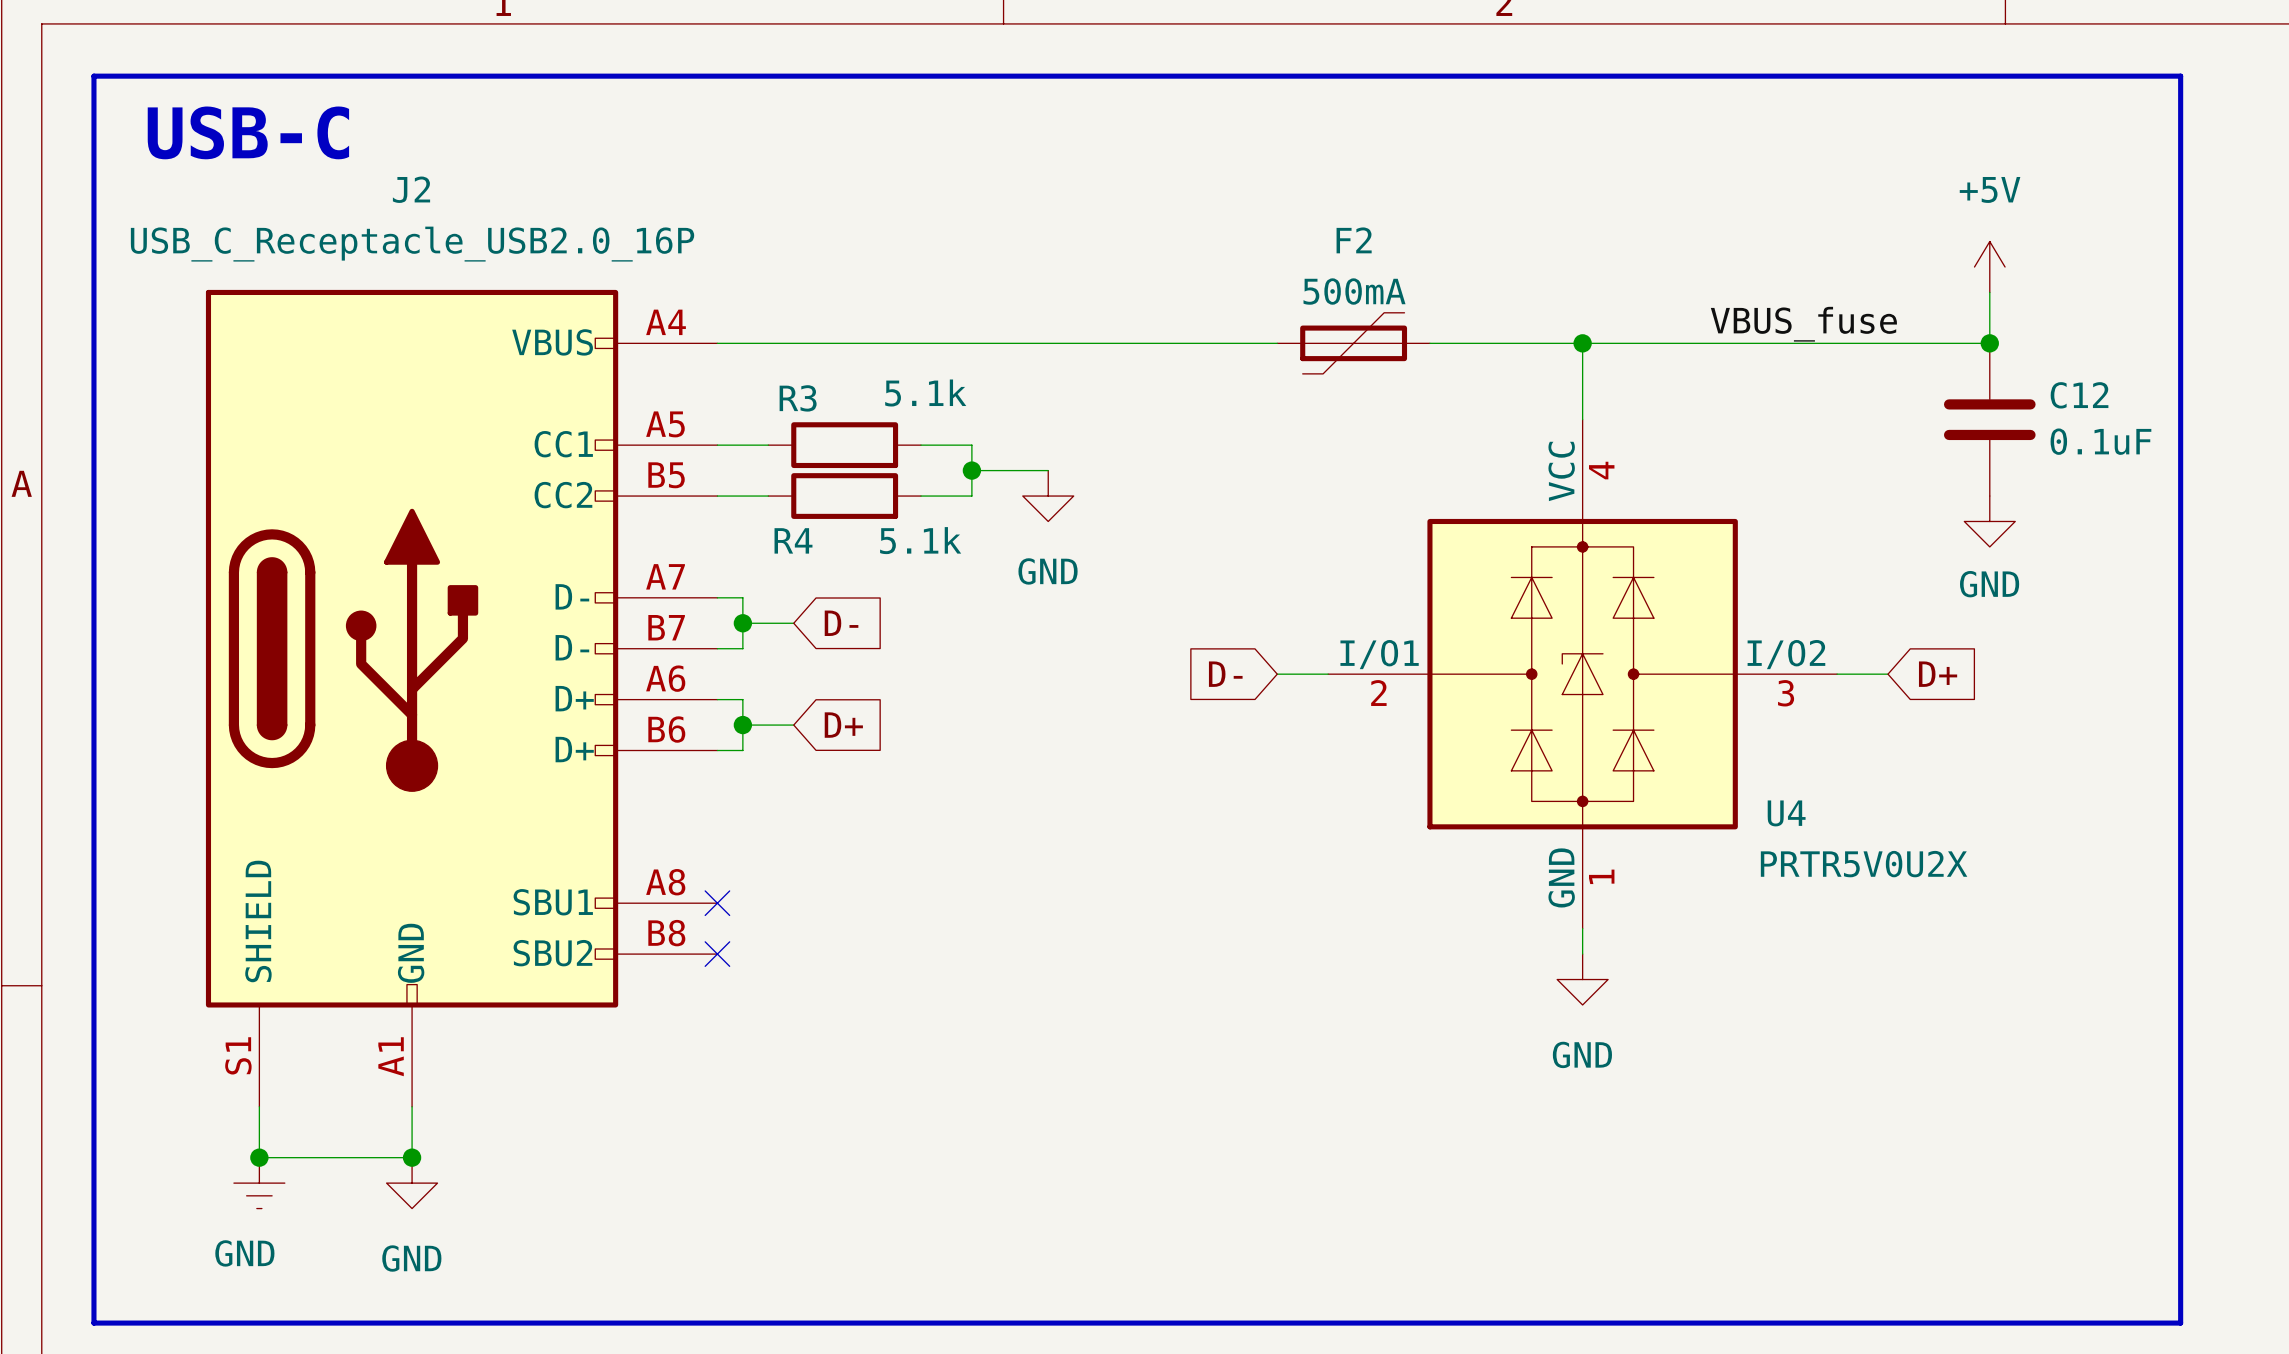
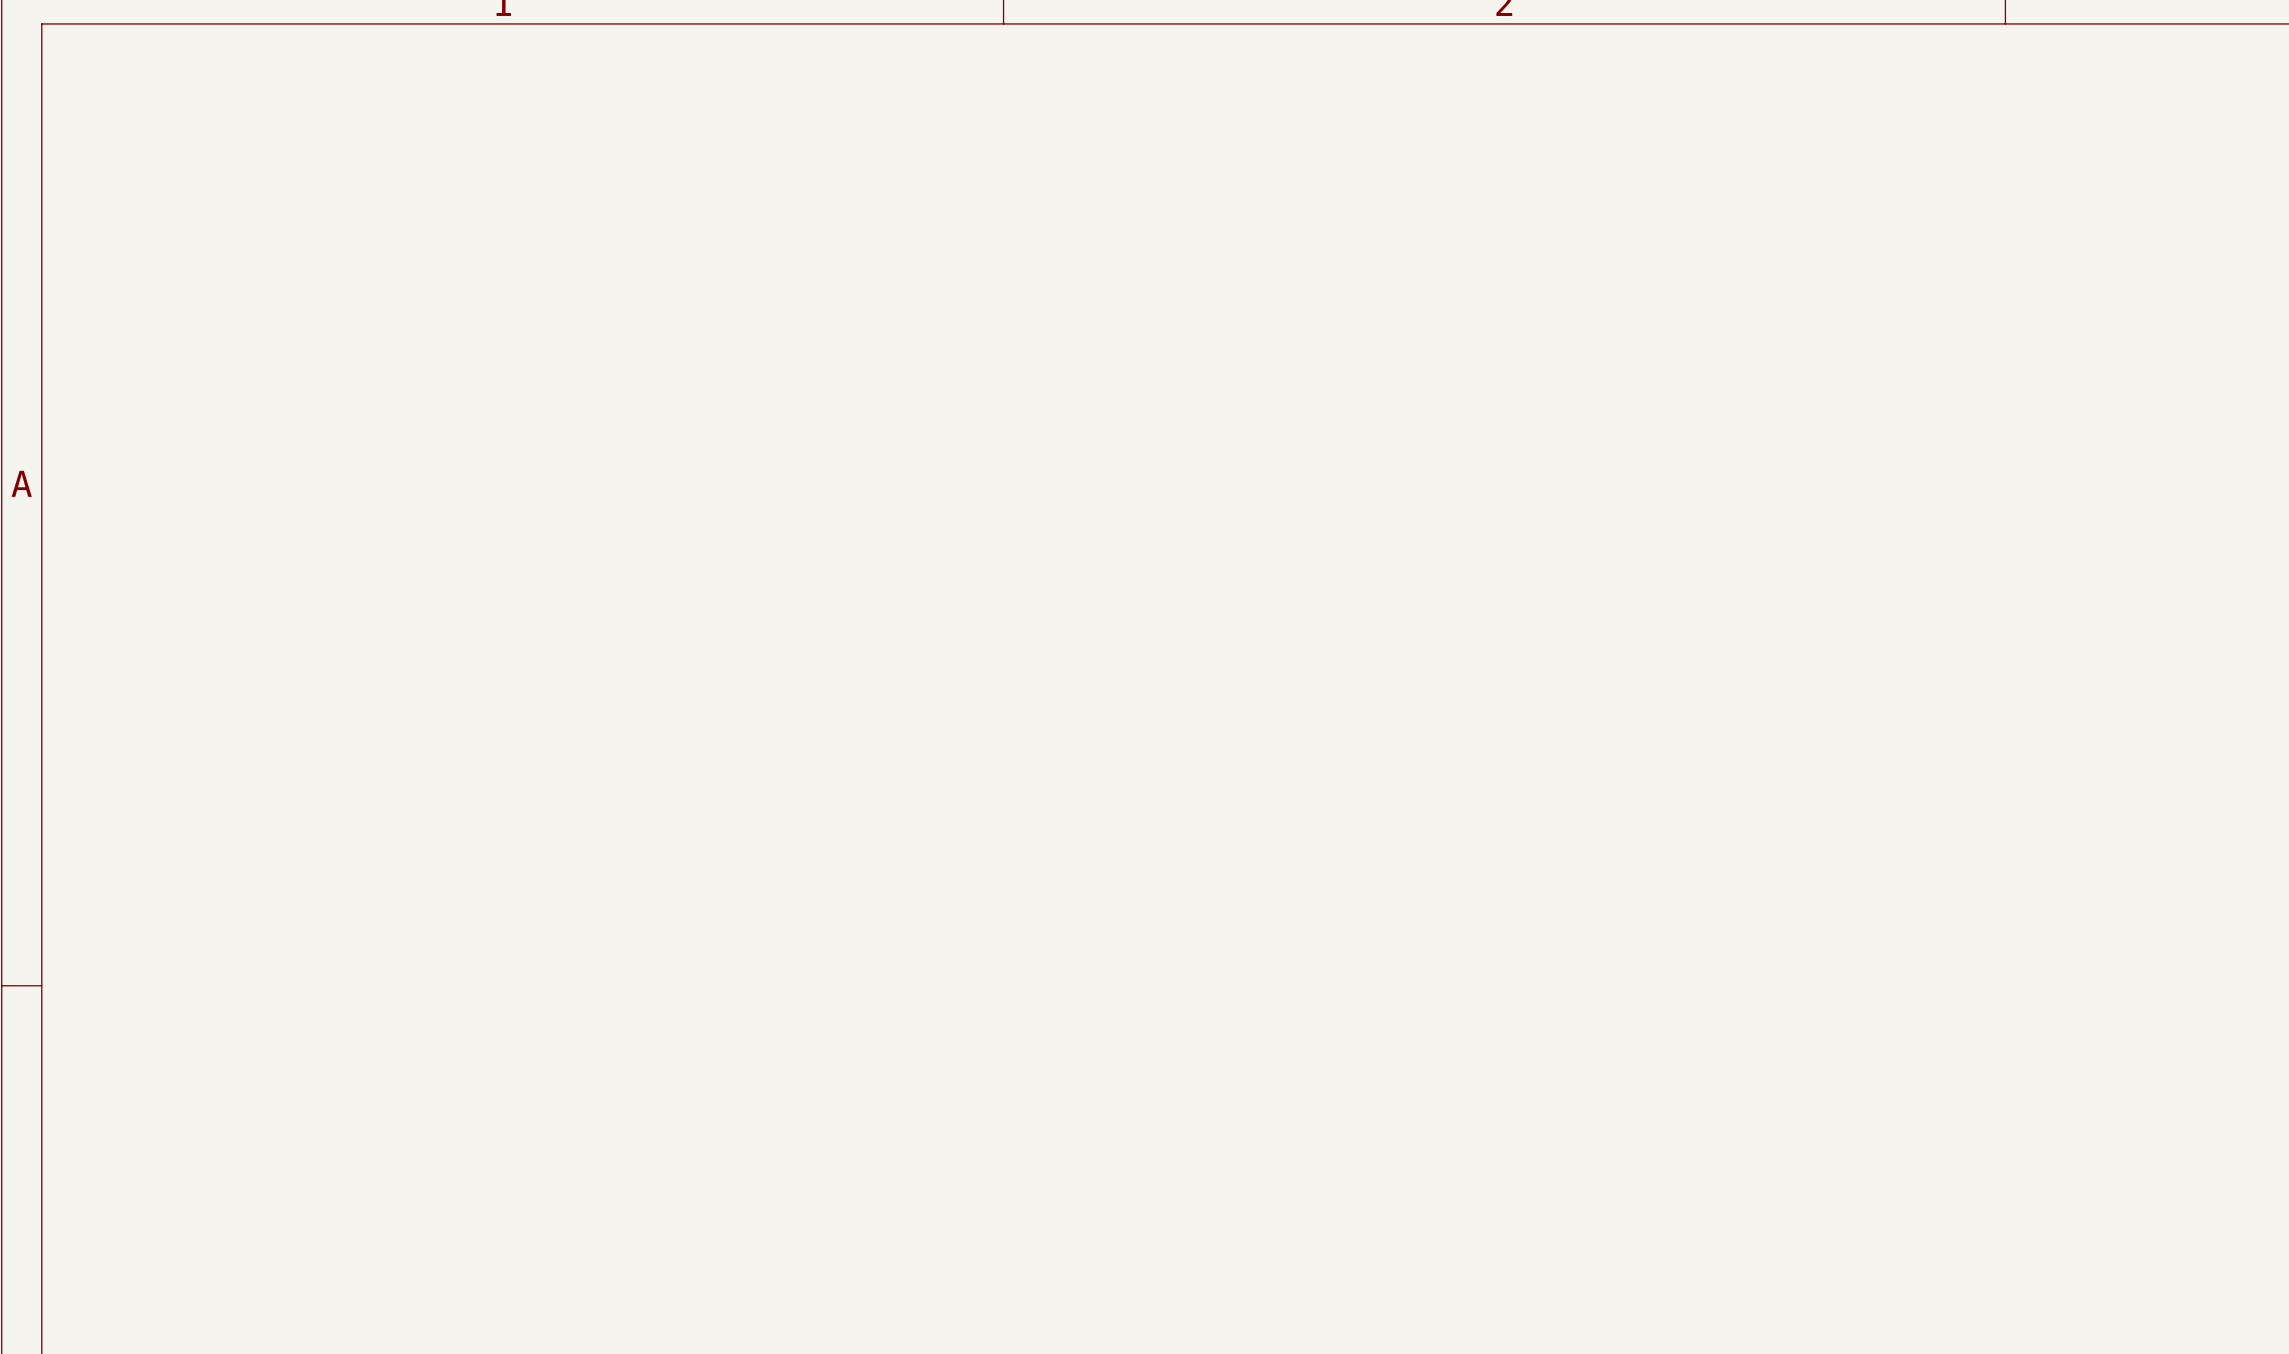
line: (93, 76) (2180, 76) (2180, 1323) (93, 1323) (93, 76) -> none
text: USB-C (248, 132) -> none
power symbol: +5V (1989, 267) -> none
wire: (1989, 292) (1989, 343) (1429, 343) -> none
label: VBUS_fuse (1803, 324) -> none
wire: (717, 343) (1277, 343) -> none
F2: 500mA (1353, 343) -> none
wire: (1582, 343) (1582, 419) -> none
junction: (1582, 343) -> none
junction: (1989, 343) -> none
C12: 0.1uF (1989, 419) -> none
wire: (717, 445) (768, 445) -> none
R3: 5.1k (844, 445) -> none
wire: (921, 445) (971, 445) (971, 496) (921, 496) -> none
wire: (971, 470) (1048, 470) -> none
junction: (971, 470) -> none
wire: (717, 496) (768, 496) -> none
R4: 5.1k (844, 496) -> none
power symbol: GND (1048, 496) -> none
power symbol: GND (1989, 521) -> none
wire: (717, 597) (742, 597) (742, 648) (717, 648) -> none
wire: (742, 623) (793, 623) -> none
junction: (742, 623) -> none
global label: D- (841, 623) -> none
global label: D- (1225, 674) -> none
wire: (1277, 674) (1328, 674) -> none
U4: PRTR5V0U2X (1582, 674) -> none
wire: (1837, 674) (1888, 674) -> none
global label: D+ (1938, 674) -> none
J2: USB_C_Receptacle_USB2.0_16P (461, 698) -> none
wire: (717, 699) (742, 699) (742, 750) (717, 750) -> none
wire: (742, 725) (793, 725) -> none
junction: (742, 725) -> none
global label: D+ (843, 725) -> none
no-connect mark: (717, 903) -> none
wire: (1582, 928) (1582, 954) -> none
no-connect mark: (717, 954) -> none
power symbol: GND (1582, 979) -> none
wire: (259, 1106) (259, 1157) (412, 1157) (412, 1106) -> none
junction: (259, 1157) -> none
junction: (412, 1157) -> none
power symbol: GND (259, 1183) -> none
power symbol: GND (412, 1183) -> none

